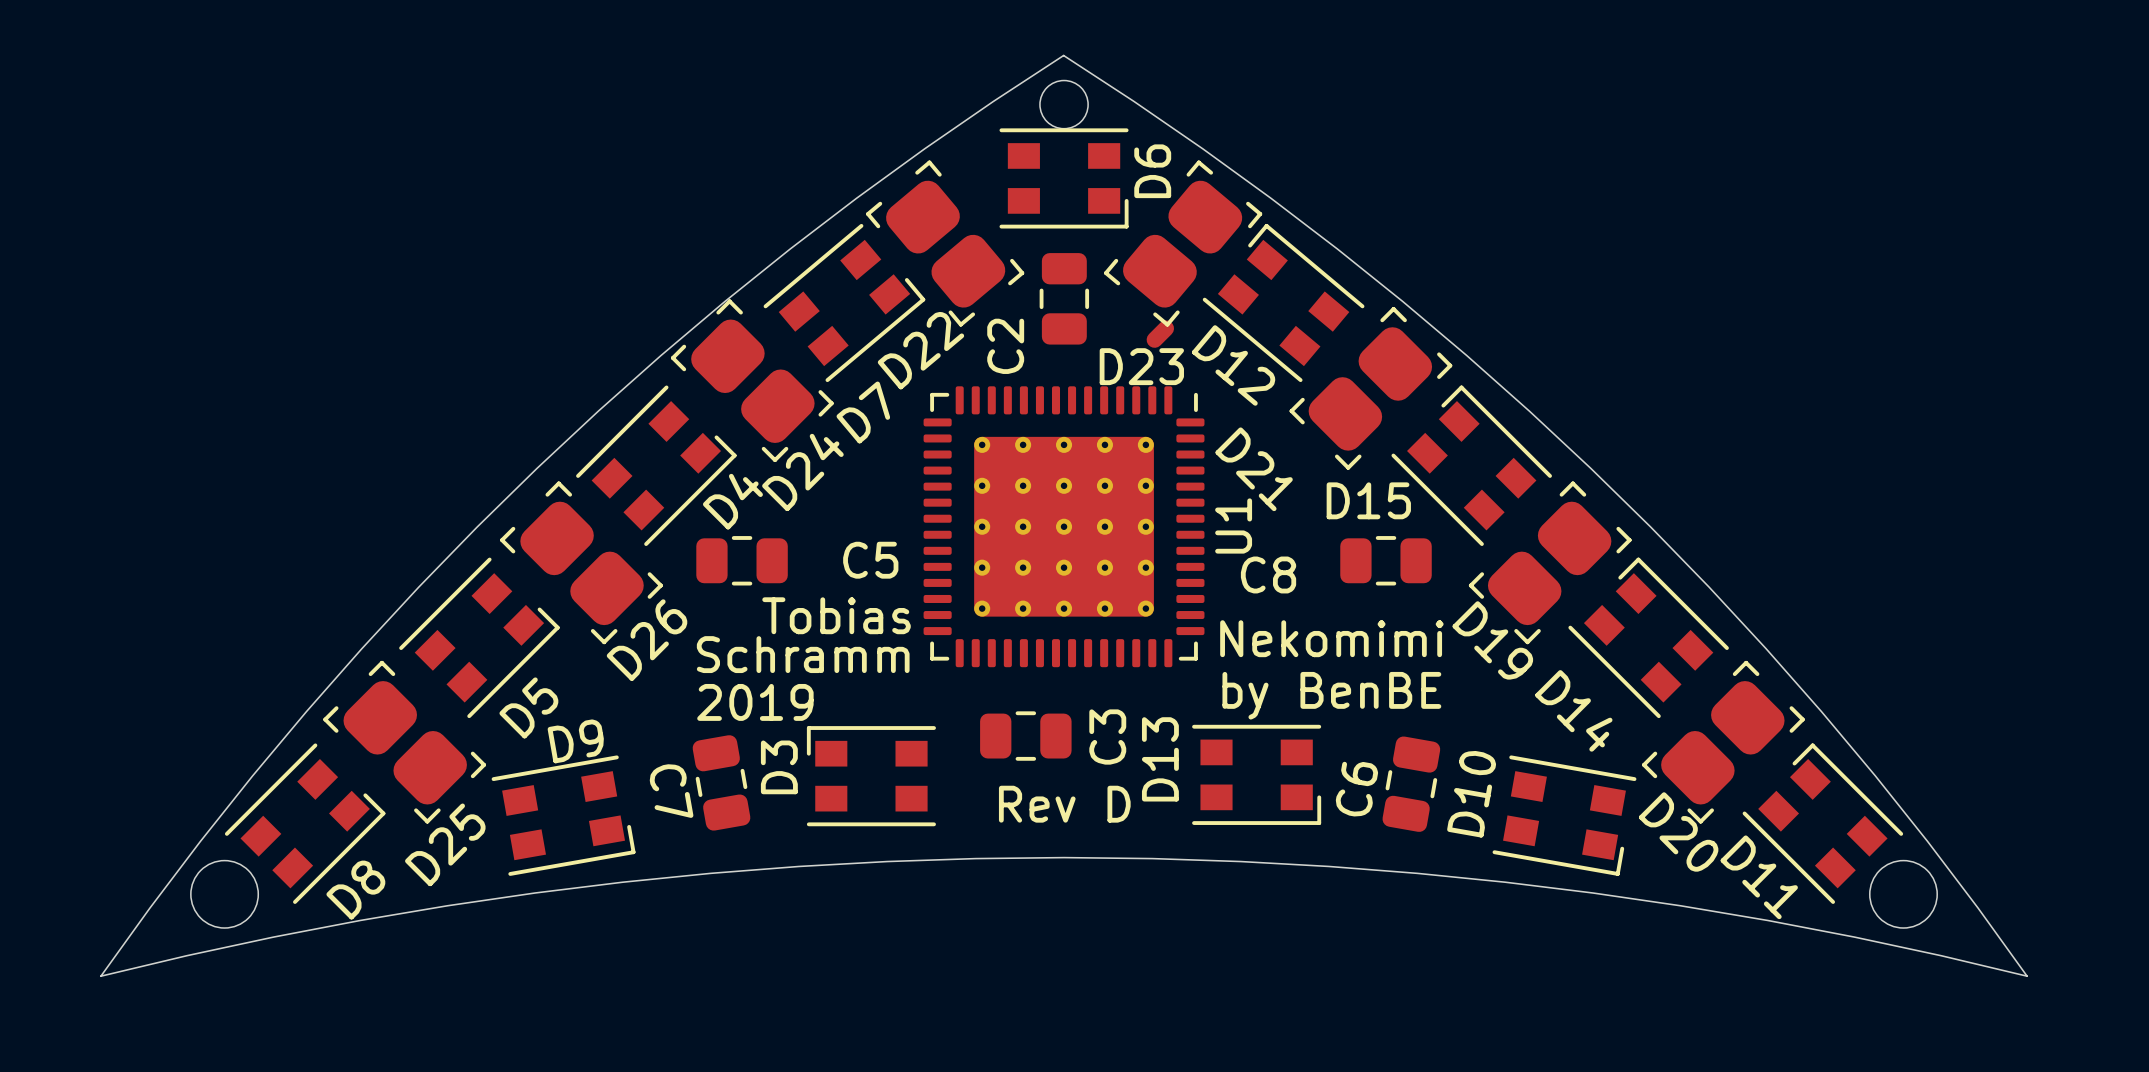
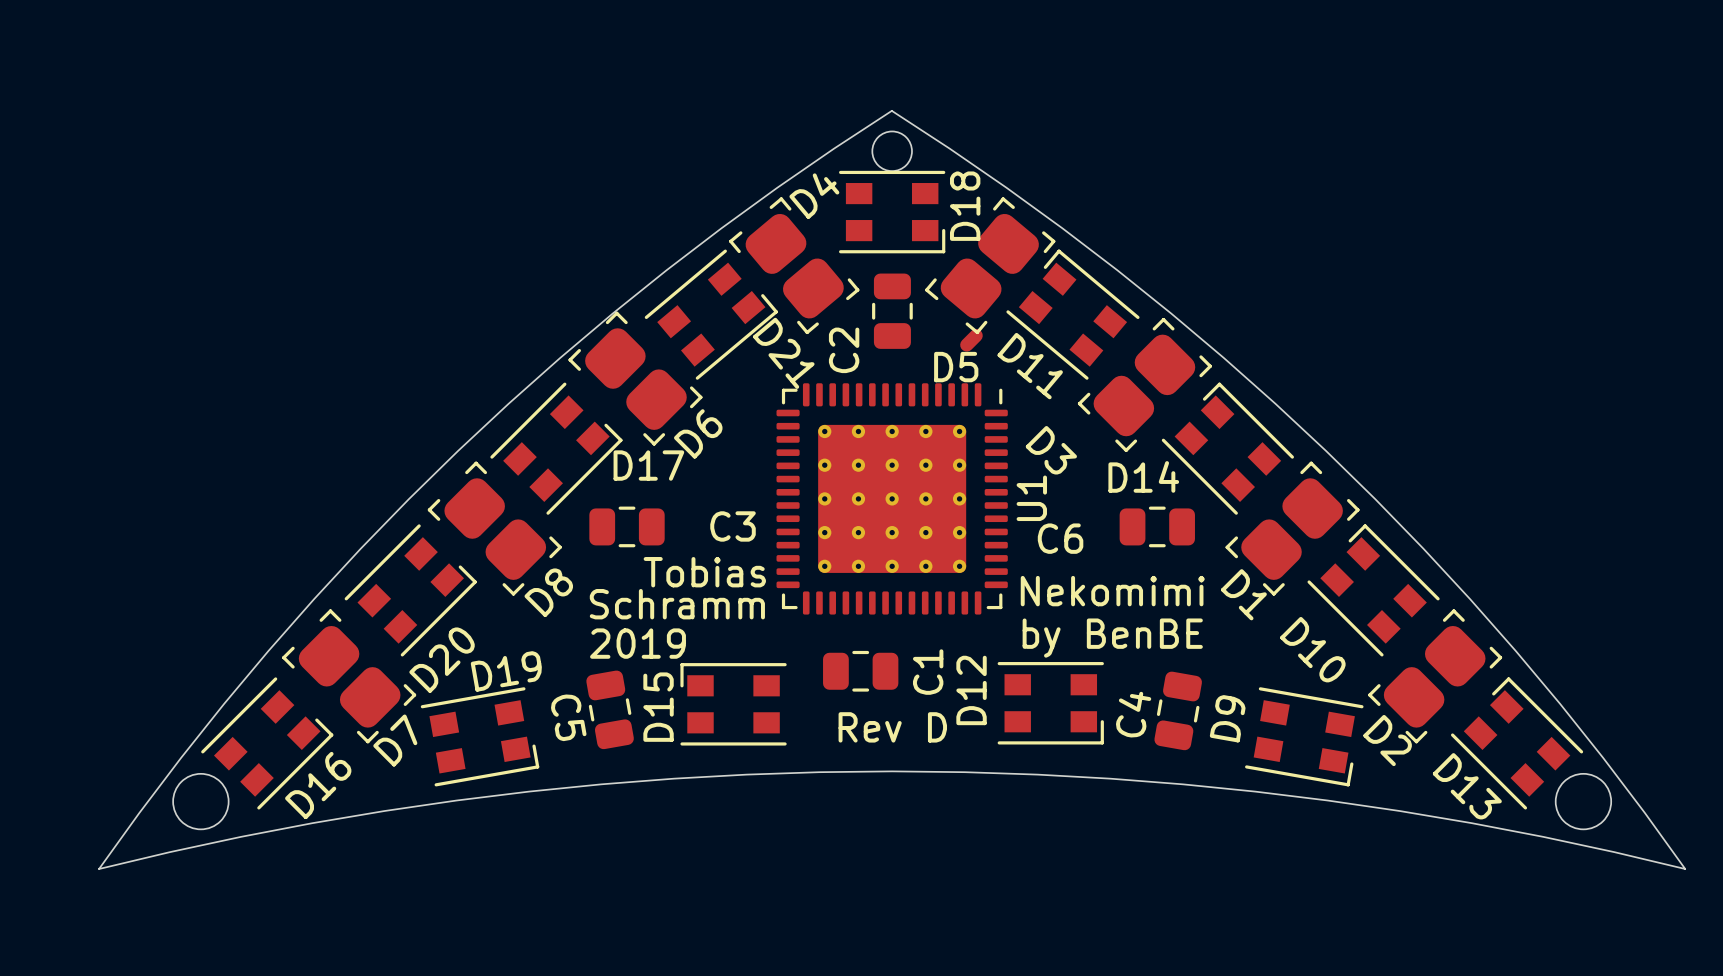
D6 name: D6 (1152, 171) -> D18 (965, 206)
D22 name: D22 (920, 350) -> D4 (814, 196)
D12 name: D12 (1233, 365) -> D11 (1030, 366)
D23 name: D23 (1141, 366) -> D5 (956, 367)
D7 name: D7 (863, 412) -> D21 (783, 353)
D21 name: D21 (1254, 469) -> D3 (1051, 450)
D24 name: D24 (802, 472) -> D6 (698, 433)
D15 name: D15 (1368, 500) -> D14 (1143, 476)
D4 name: D4 (732, 501) -> D17 (648, 465)
C5 name: C5 (870, 560) -> C3 (733, 526)
C8 name: C8 (1268, 574) -> C6 (1060, 538)
D26 name: D26 (647, 640) -> D8 (548, 592)
D19 name: D19 (1492, 640) -> D1 (1243, 594)
D5 name: D5 (528, 707) -> D20 (442, 660)
D14 name: D14 (1573, 710) -> D10 (1312, 649)
C3 name: C3 (1107, 737) -> C1 (928, 672)
D9 name: D9 (575, 741) -> D19 (506, 671)
D13 name: D13 (1160, 759) -> D12 (971, 690)
D3 name: D3 (779, 767) -> D15 (658, 707)
C6 name: C6 (1356, 789) -> C4 (1133, 714)
C7 name: C7 (671, 791) -> C5 (568, 717)
D10 name: D10 (1471, 794) -> D9 (1227, 718)
D20 name: D20 (1678, 831) -> D2 (1387, 740)
D25 name: D25 (445, 844) -> D7 (395, 740)
D11 name: D11 (1759, 877) -> D13 (1467, 786)
D8 name: D8 (355, 890) -> D16 (318, 785)

